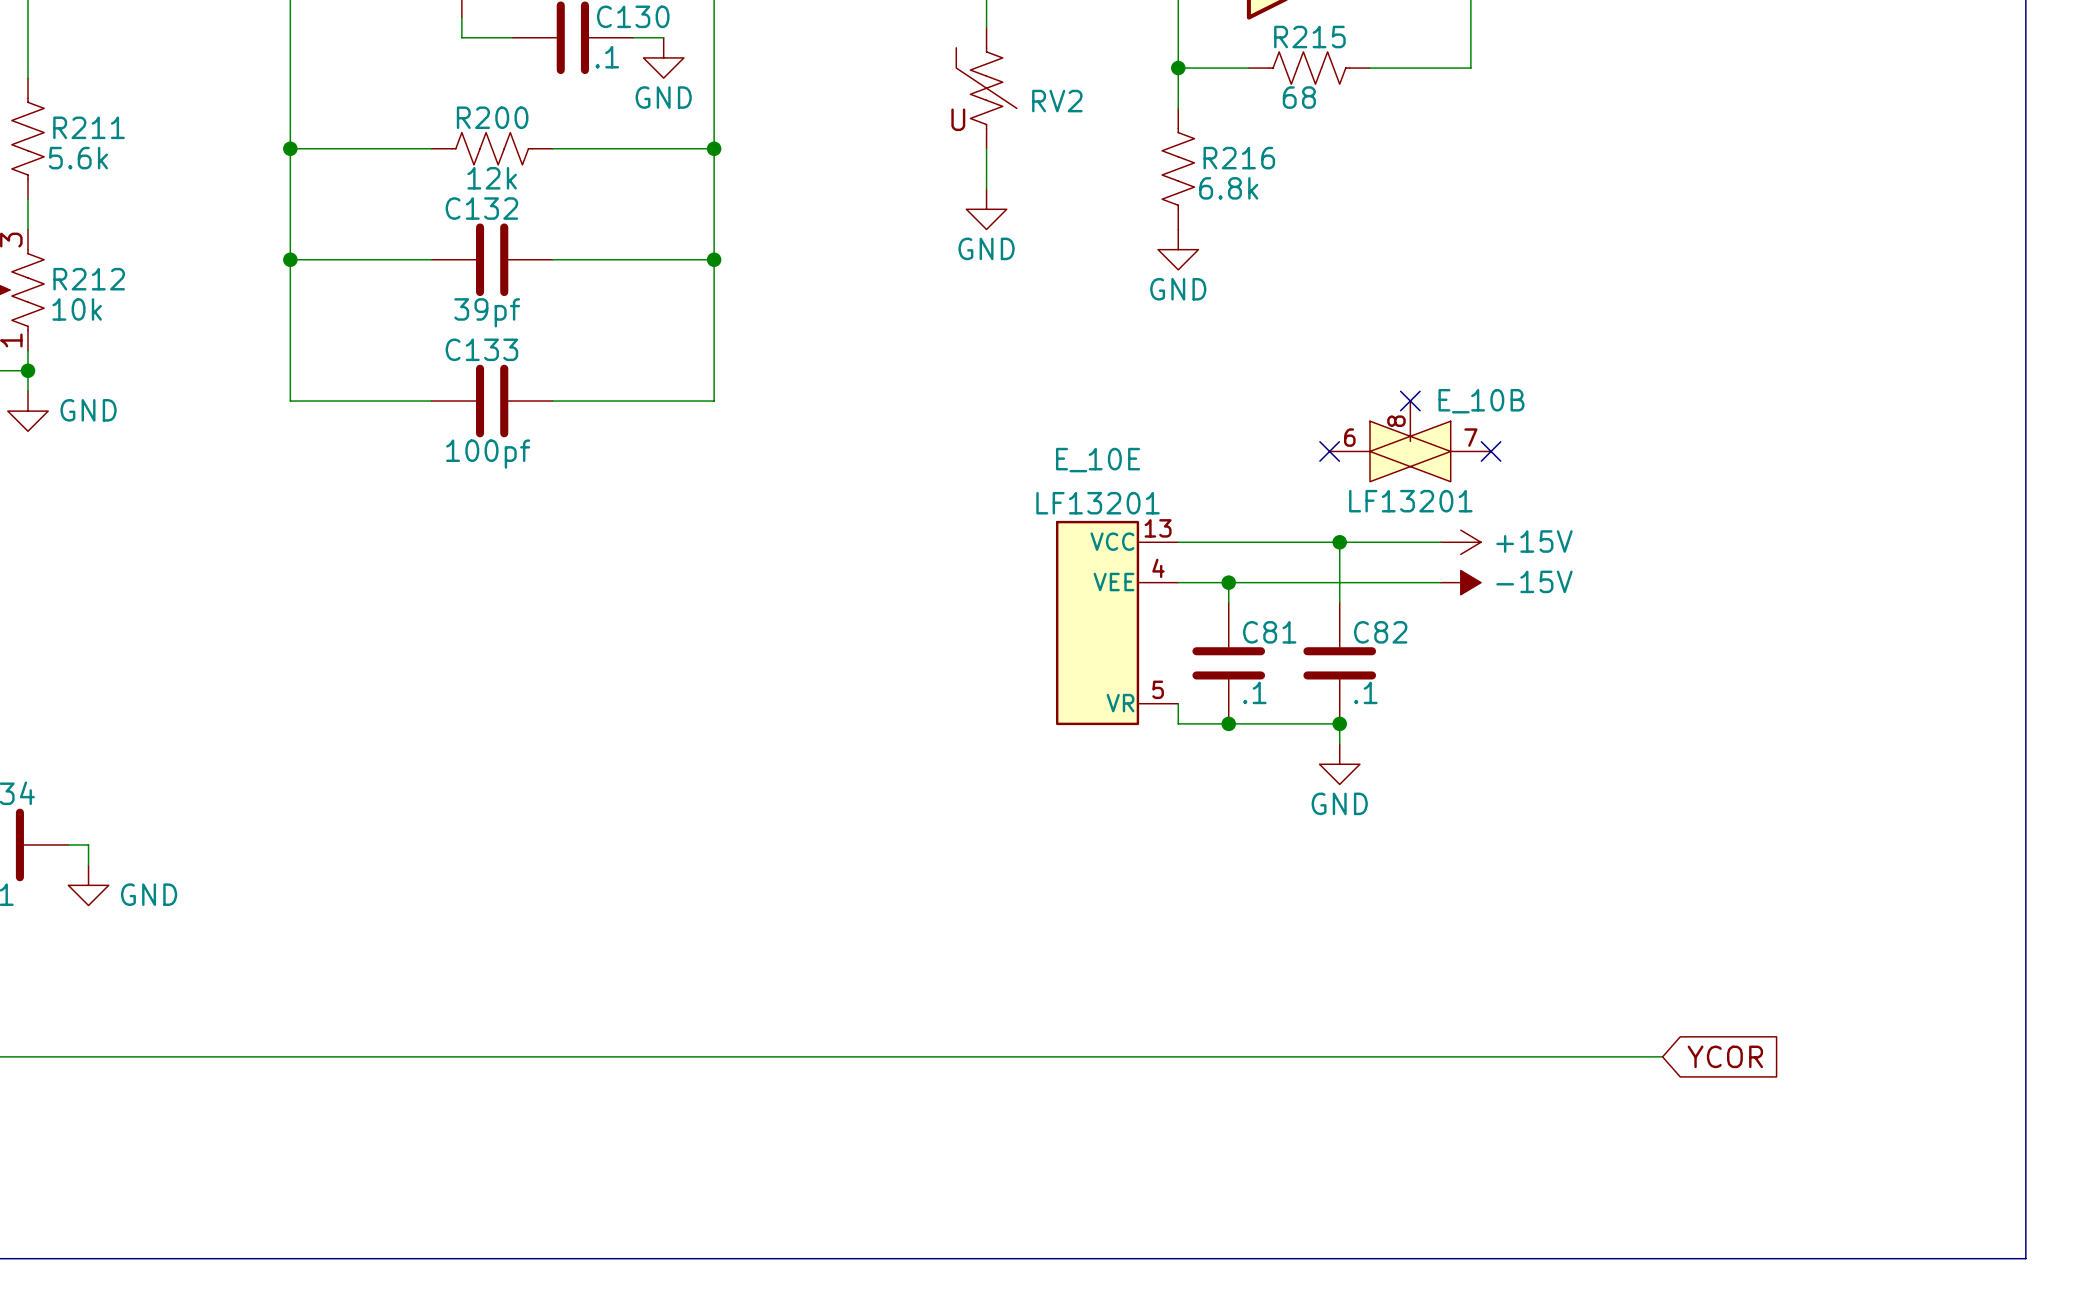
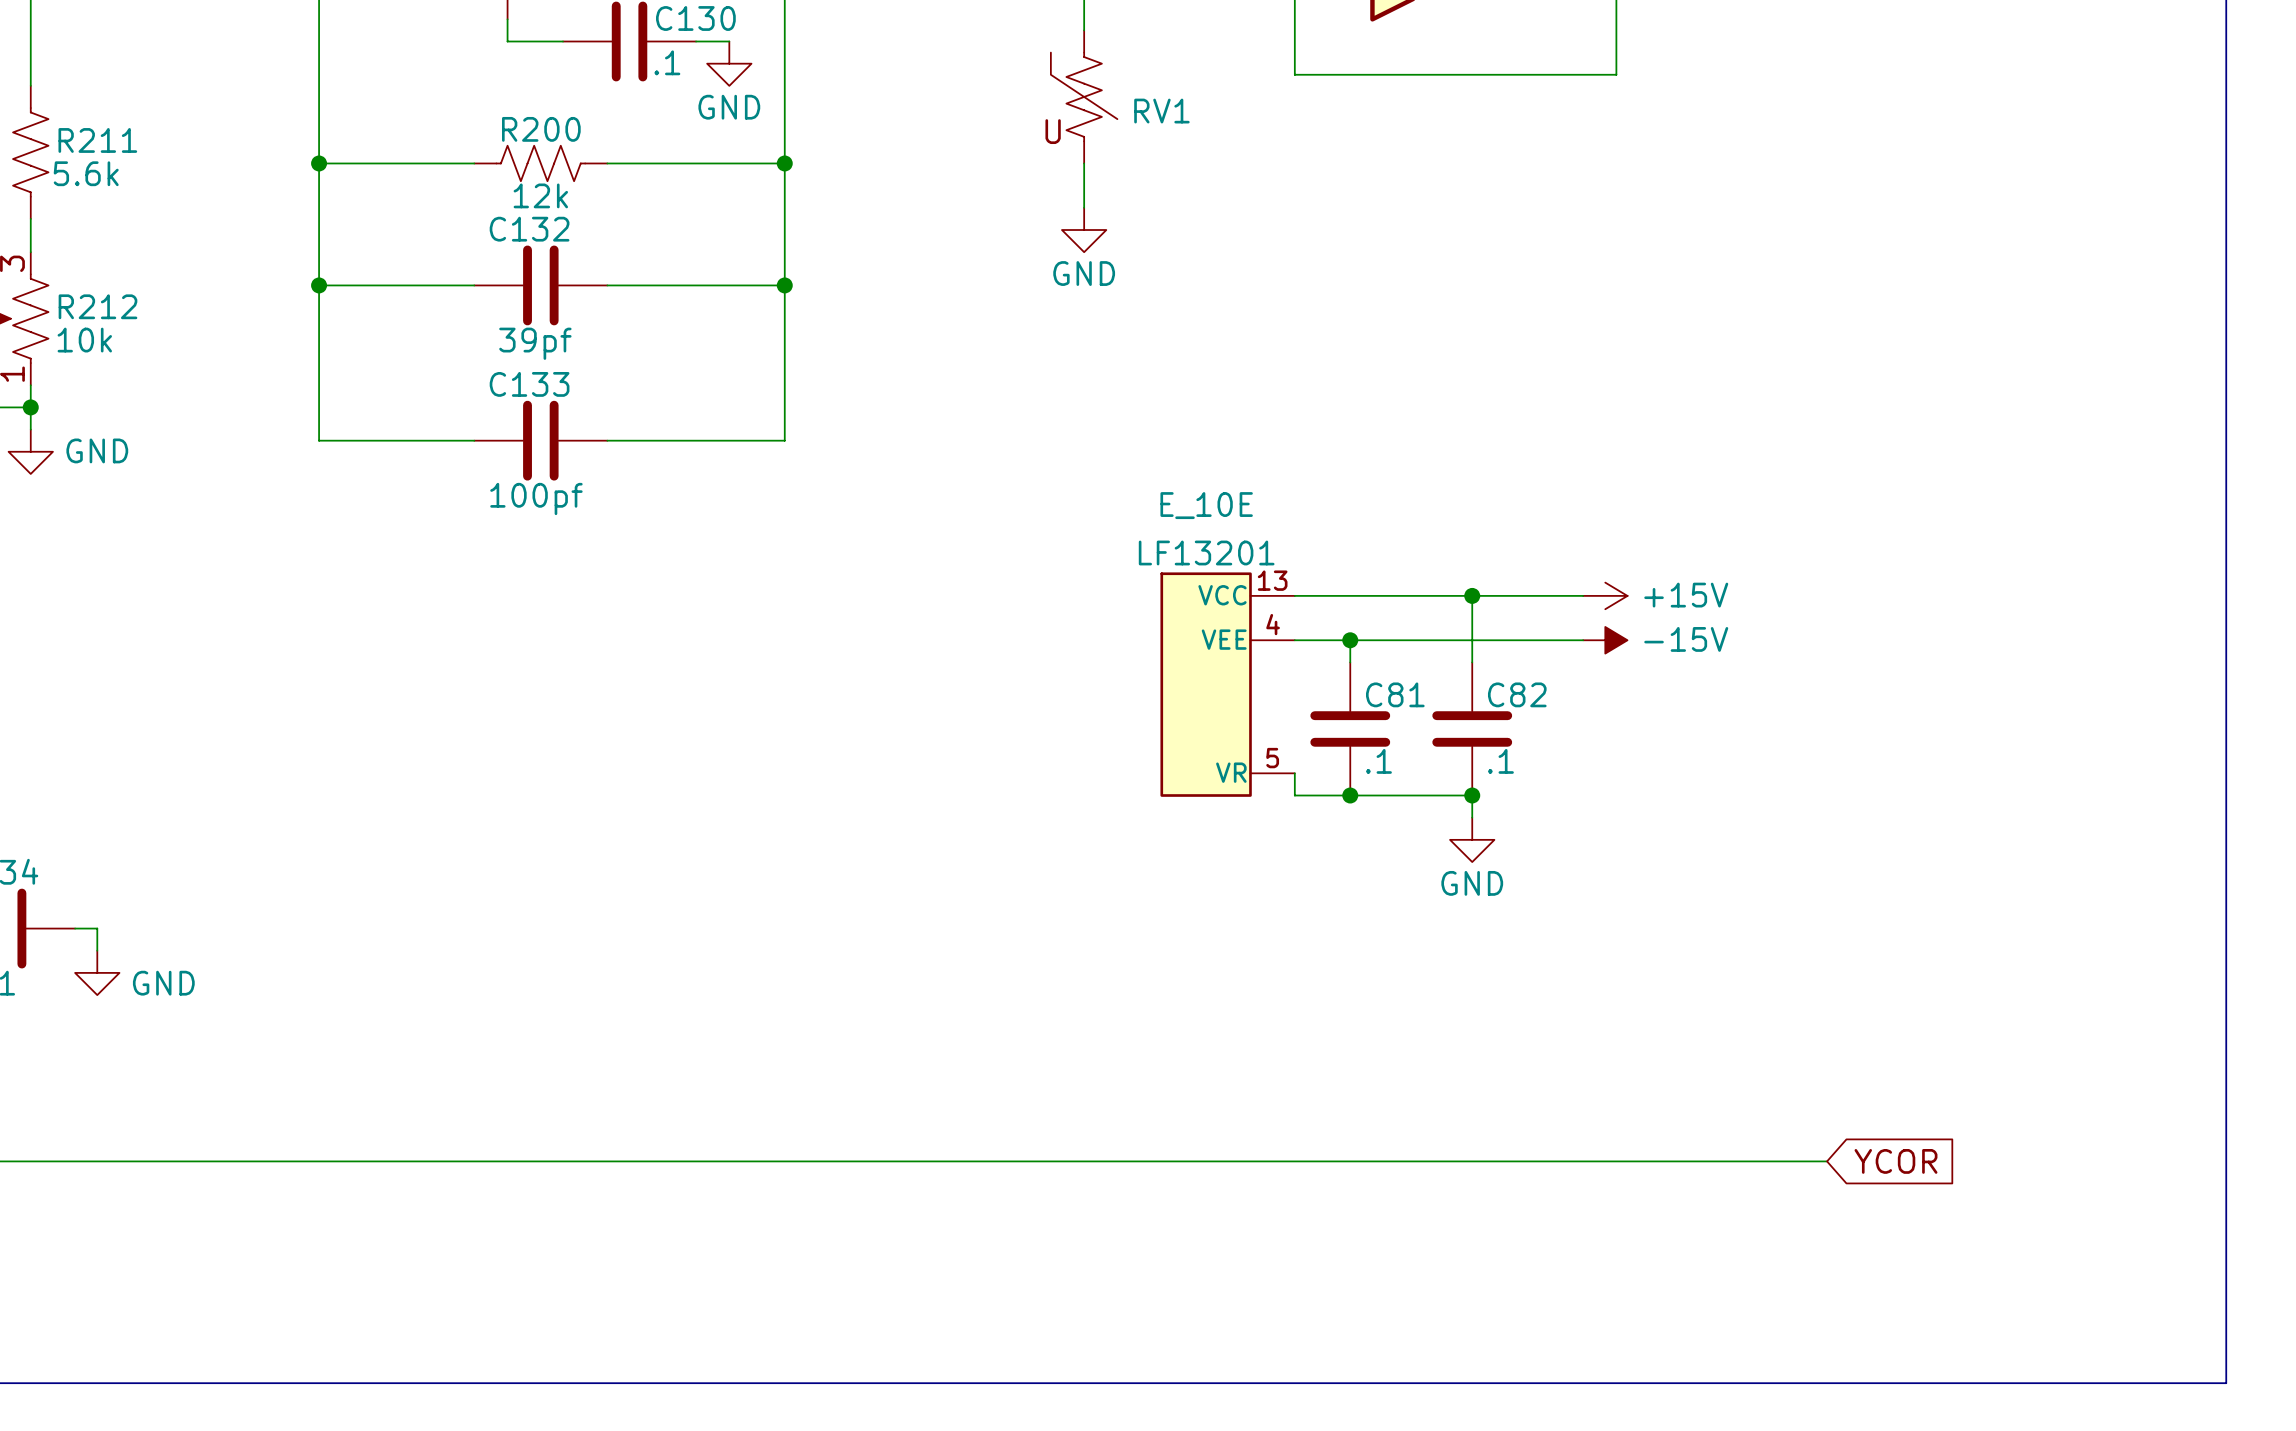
wire: (1178, 68) (1178, 108) -> none
junction: (1178, 68) -> none
wire: none -> (1372, 74) (1505, 74)
R215: 68 (1309, 68) -> none
RV2 name: RV2 (1057, 101) -> RV1 (1161, 111)
R216: 6.8k (1178, 168) -> none
power symbol: GND (1178, 249) -> none
no-connect mark: (1410, 401) -> none
E_10B: LF13201 (1410, 441) -> none
no-connect mark: (1329, 451) -> none
no-connect mark: (1491, 451) -> none

